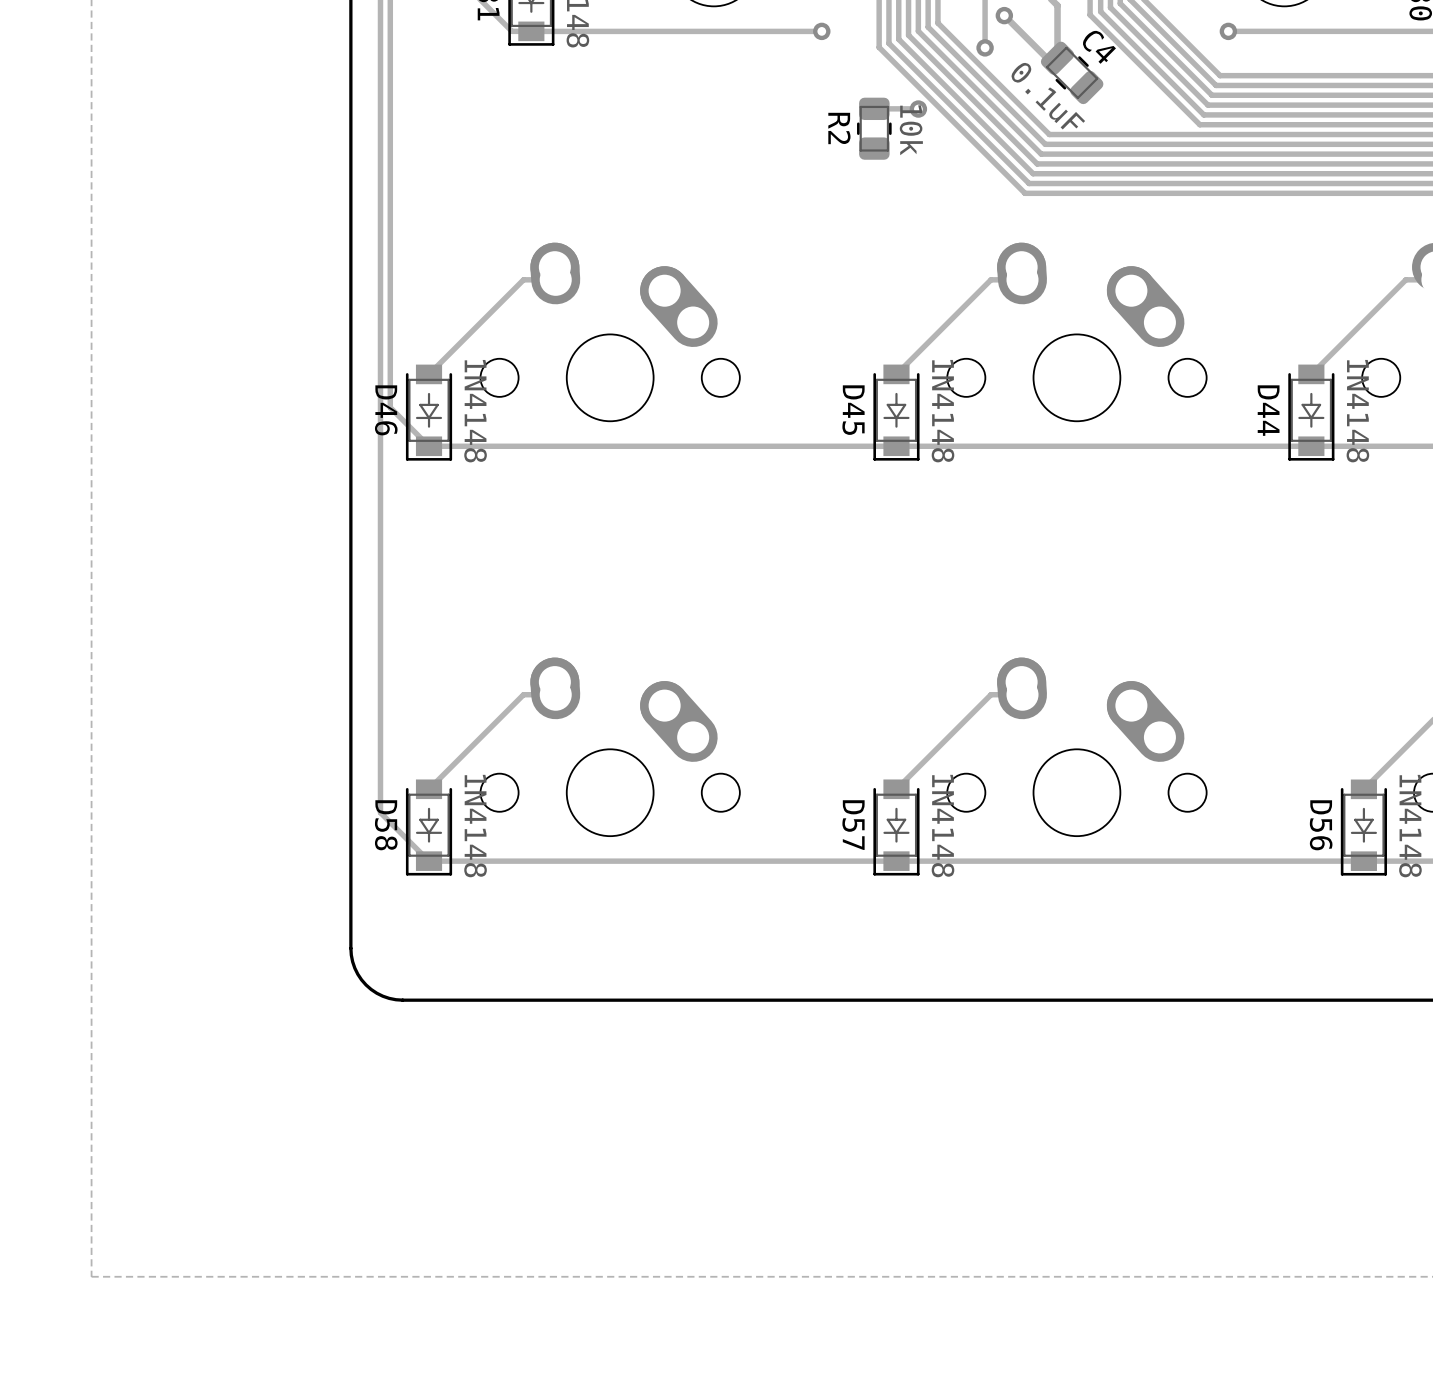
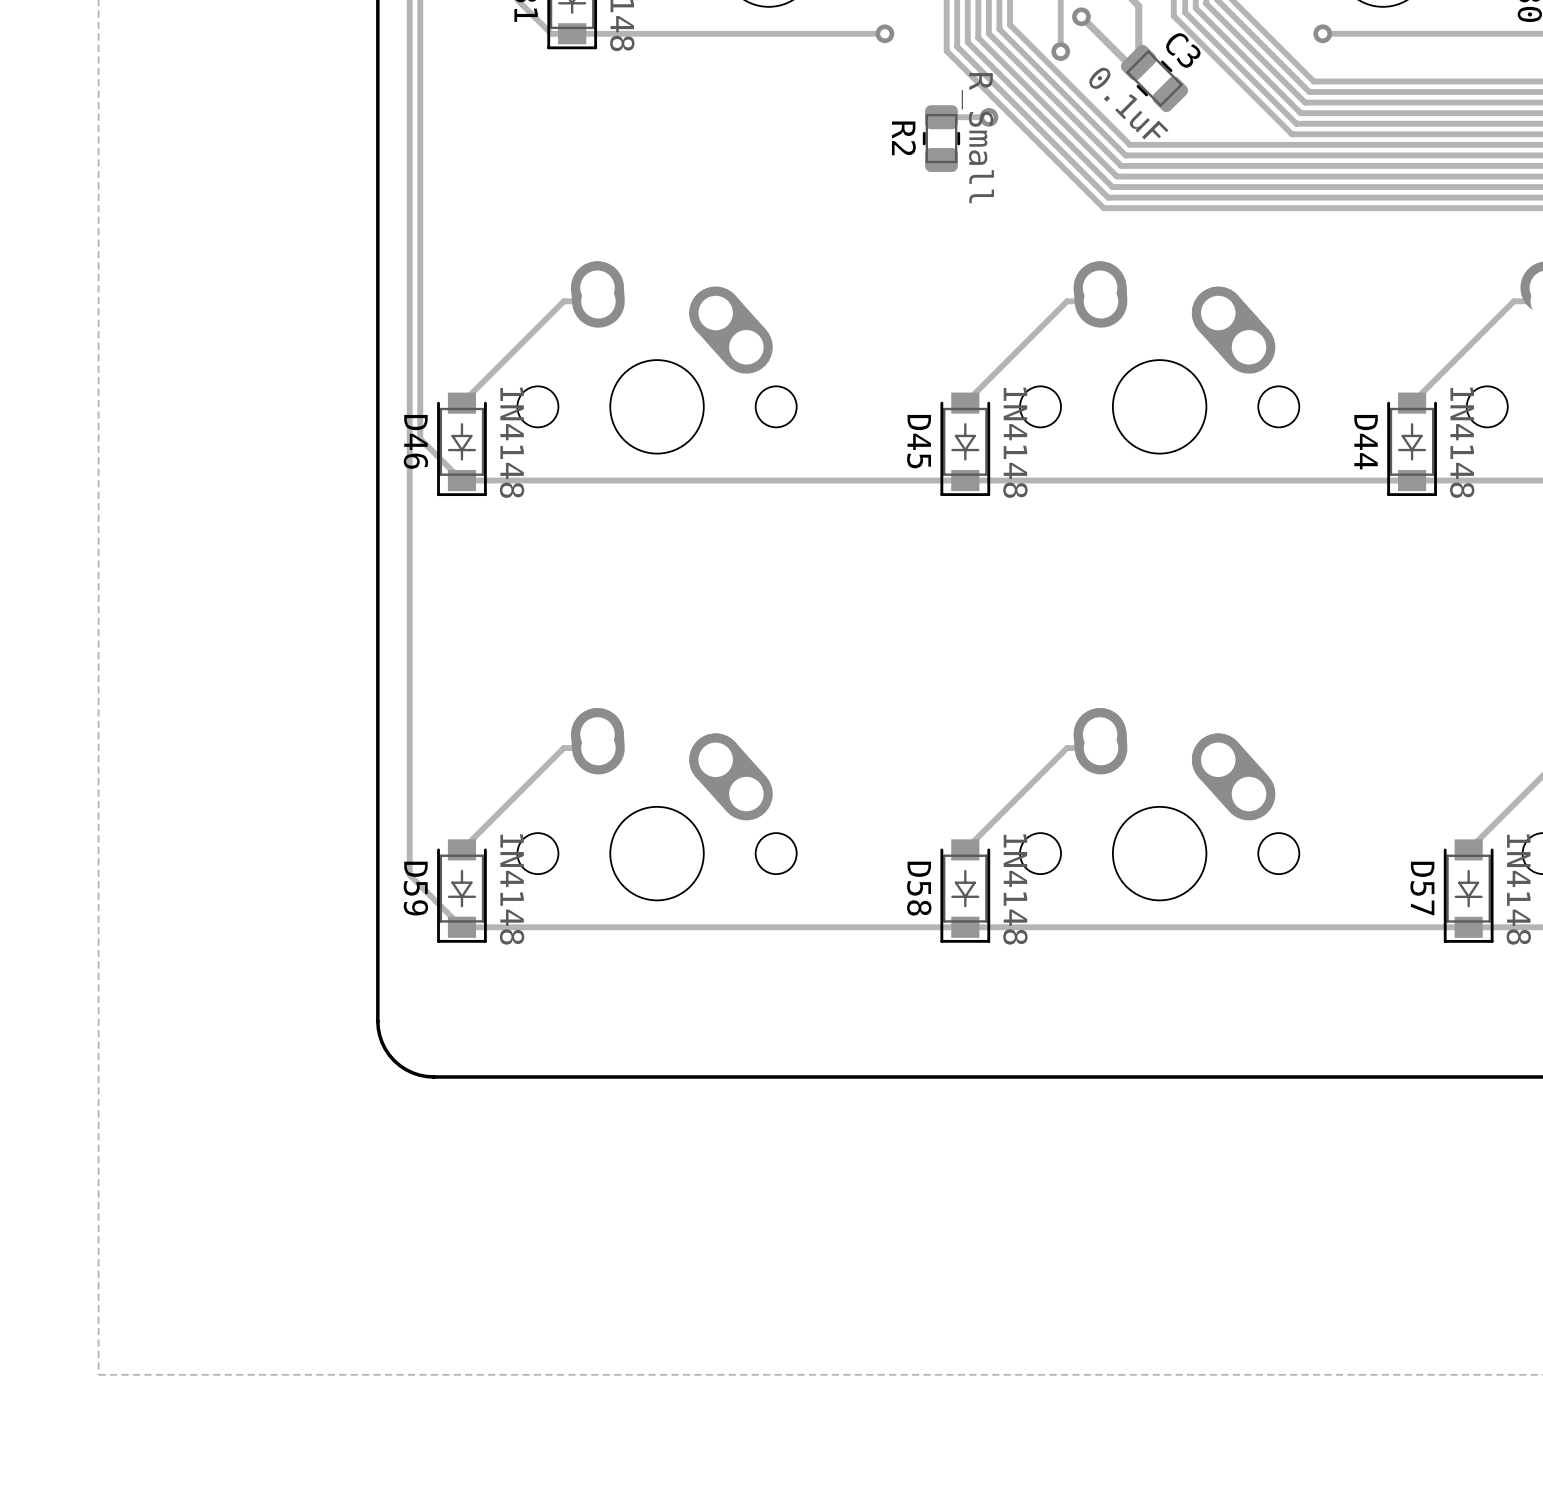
C4 name: C4 (1099, 47) -> C3 (1183, 50)
R2 value: 10k (911, 130) -> R_Small (977, 138)
D58 name: D58 (386, 825) -> D59 (415, 888)
D57 name: D57 (853, 825) -> D58 (919, 888)
D56 name: D56 (1321, 825) -> D57 (1422, 888)

